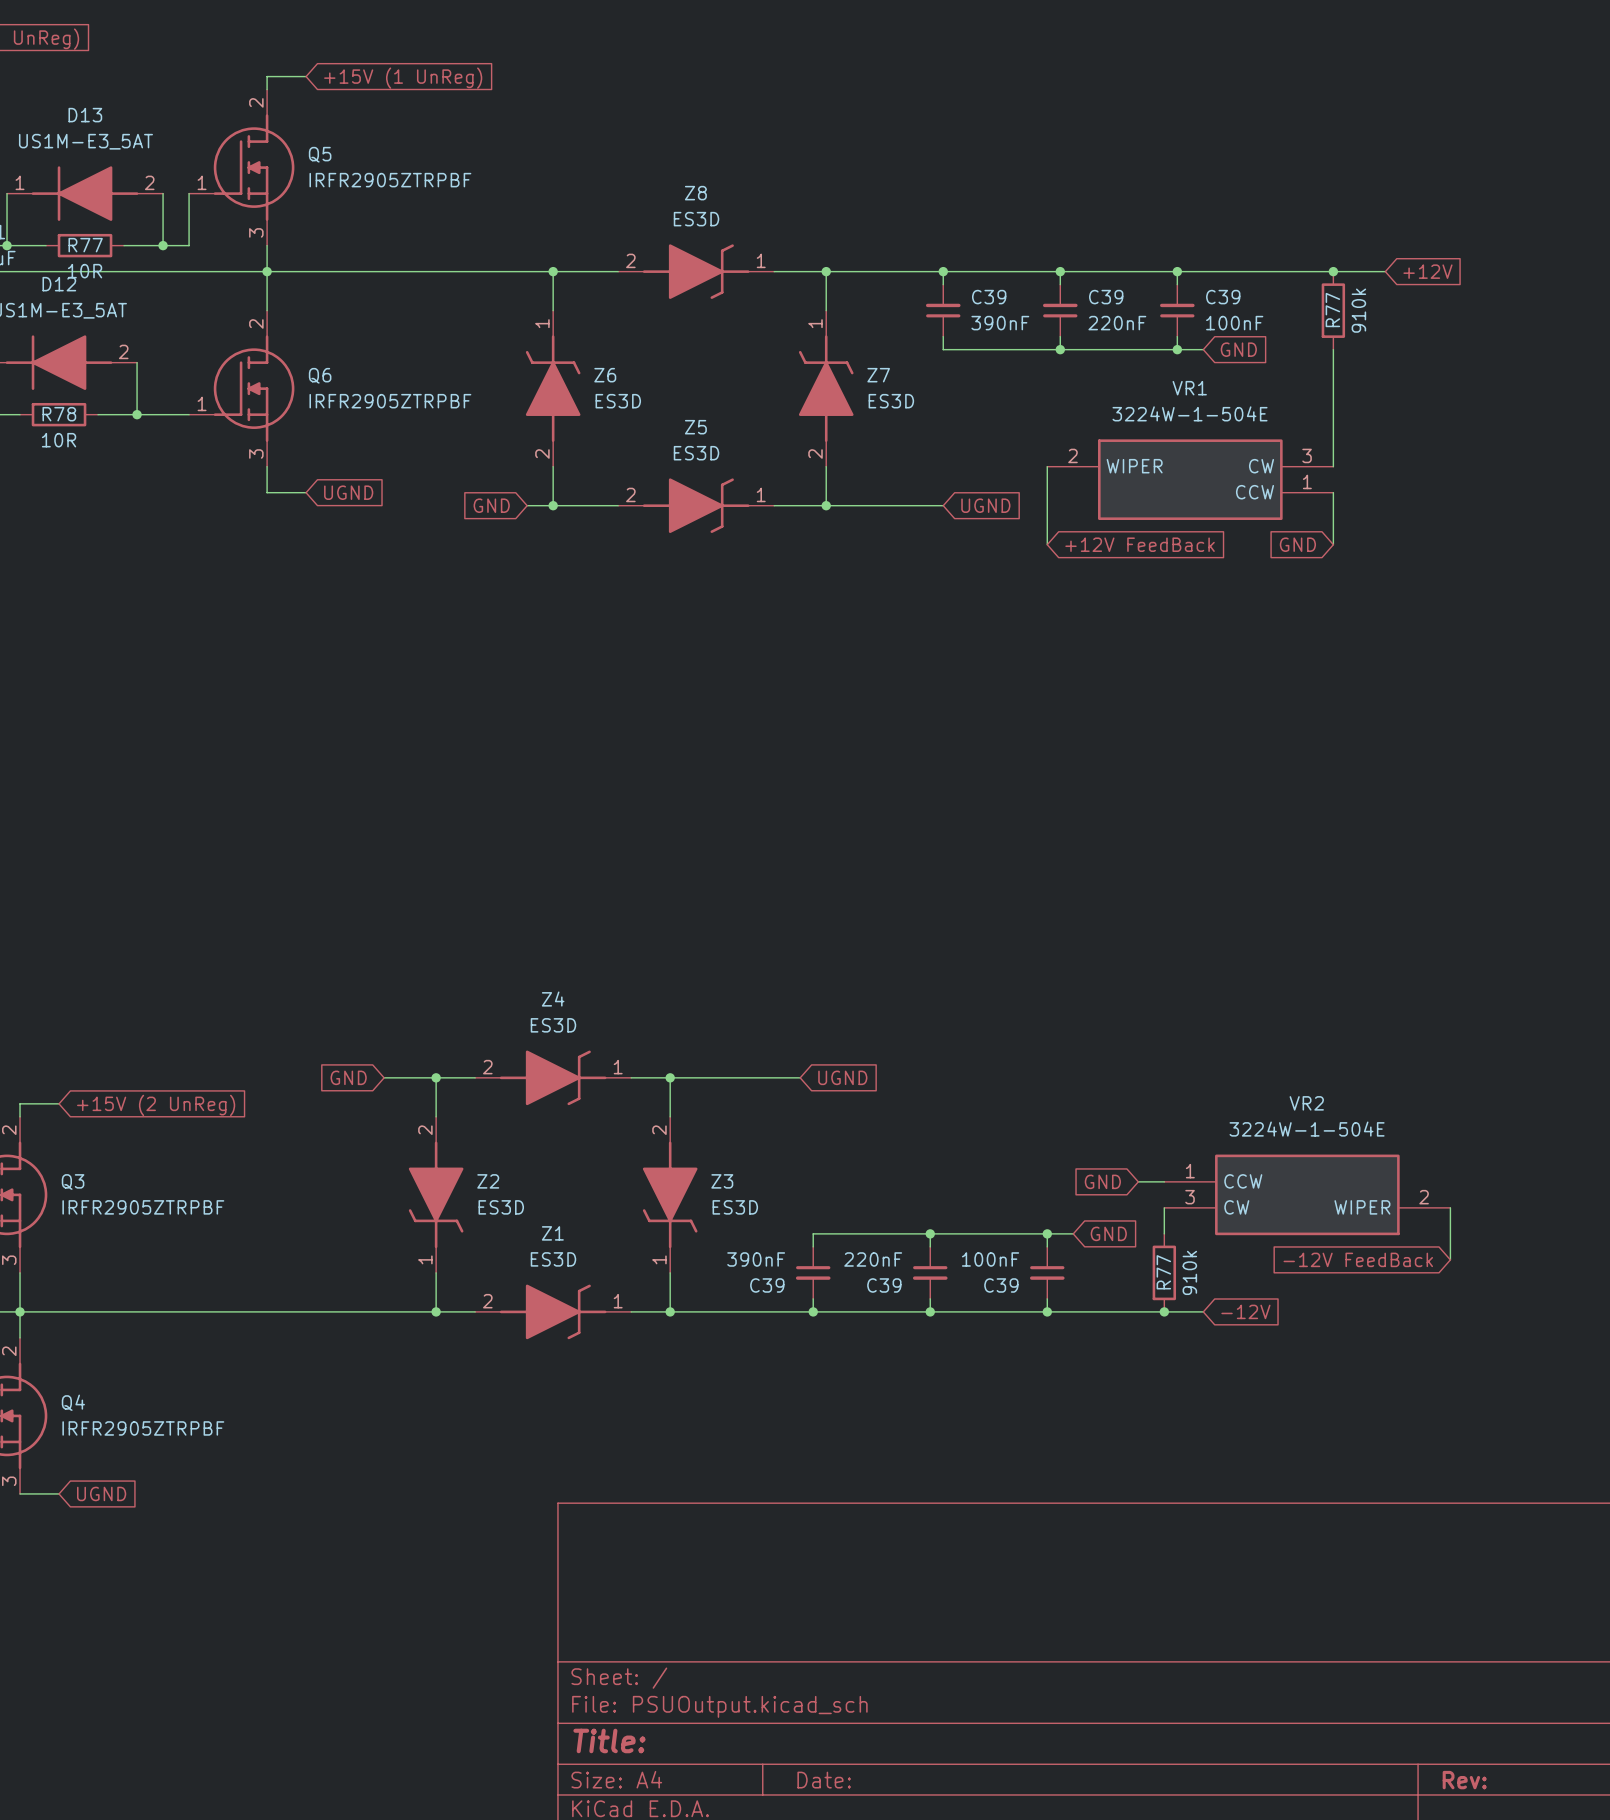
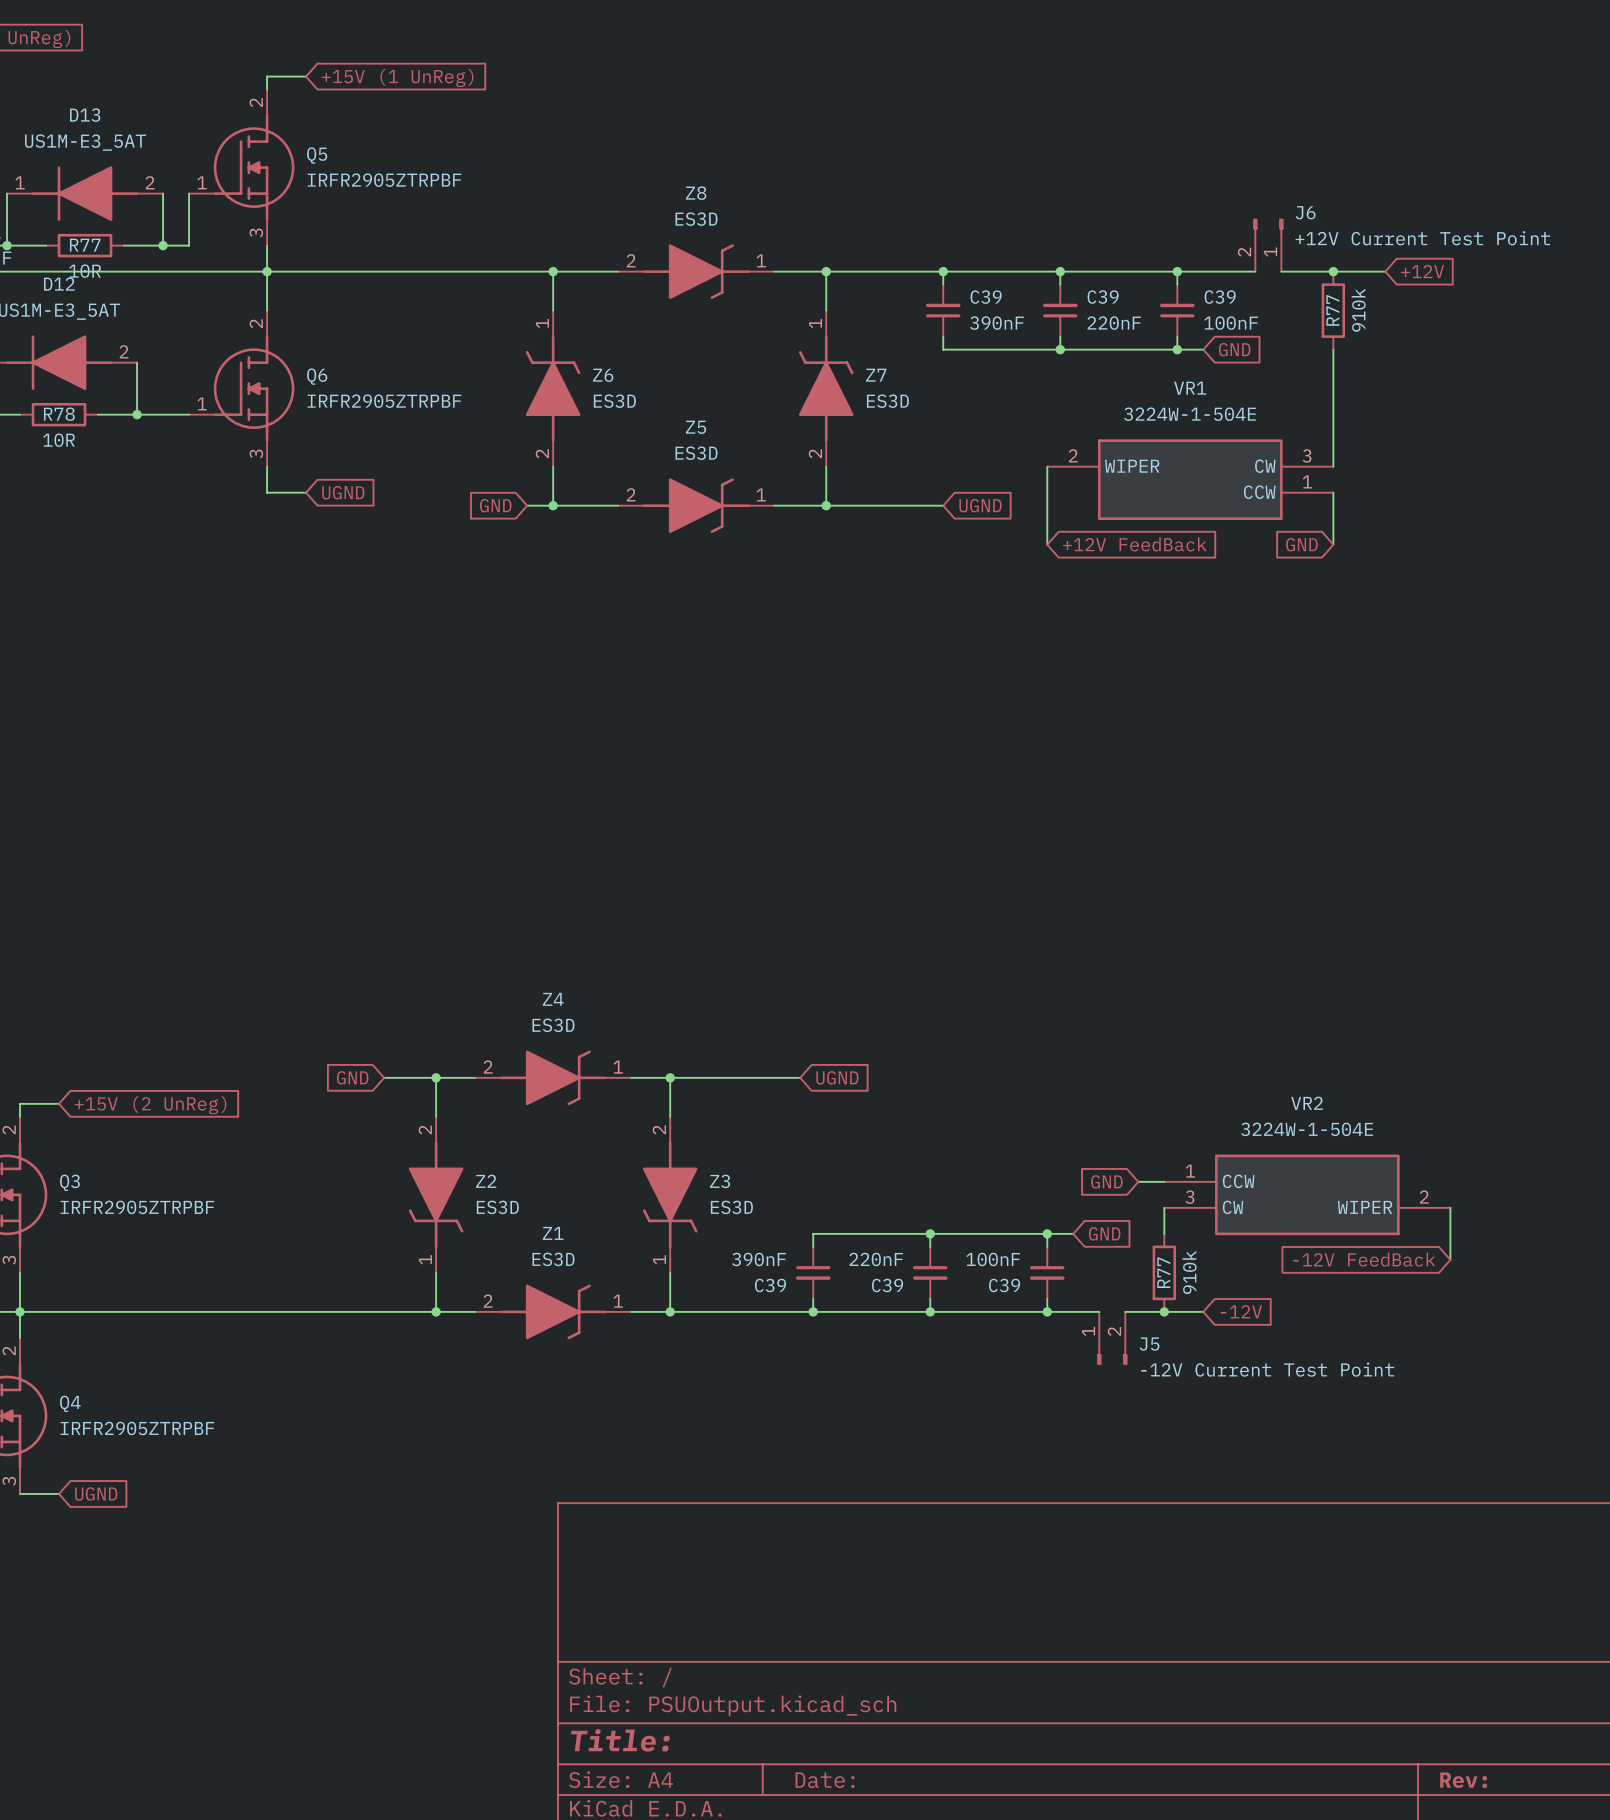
J6: none -> +12V Current Test Point (1268, 245)
wire: (1255, 271) (1281, 271) -> none
wire: (1099, 1311) (1125, 1311) -> none
J5: none -> -12V Current Test Point (1112, 1338)

